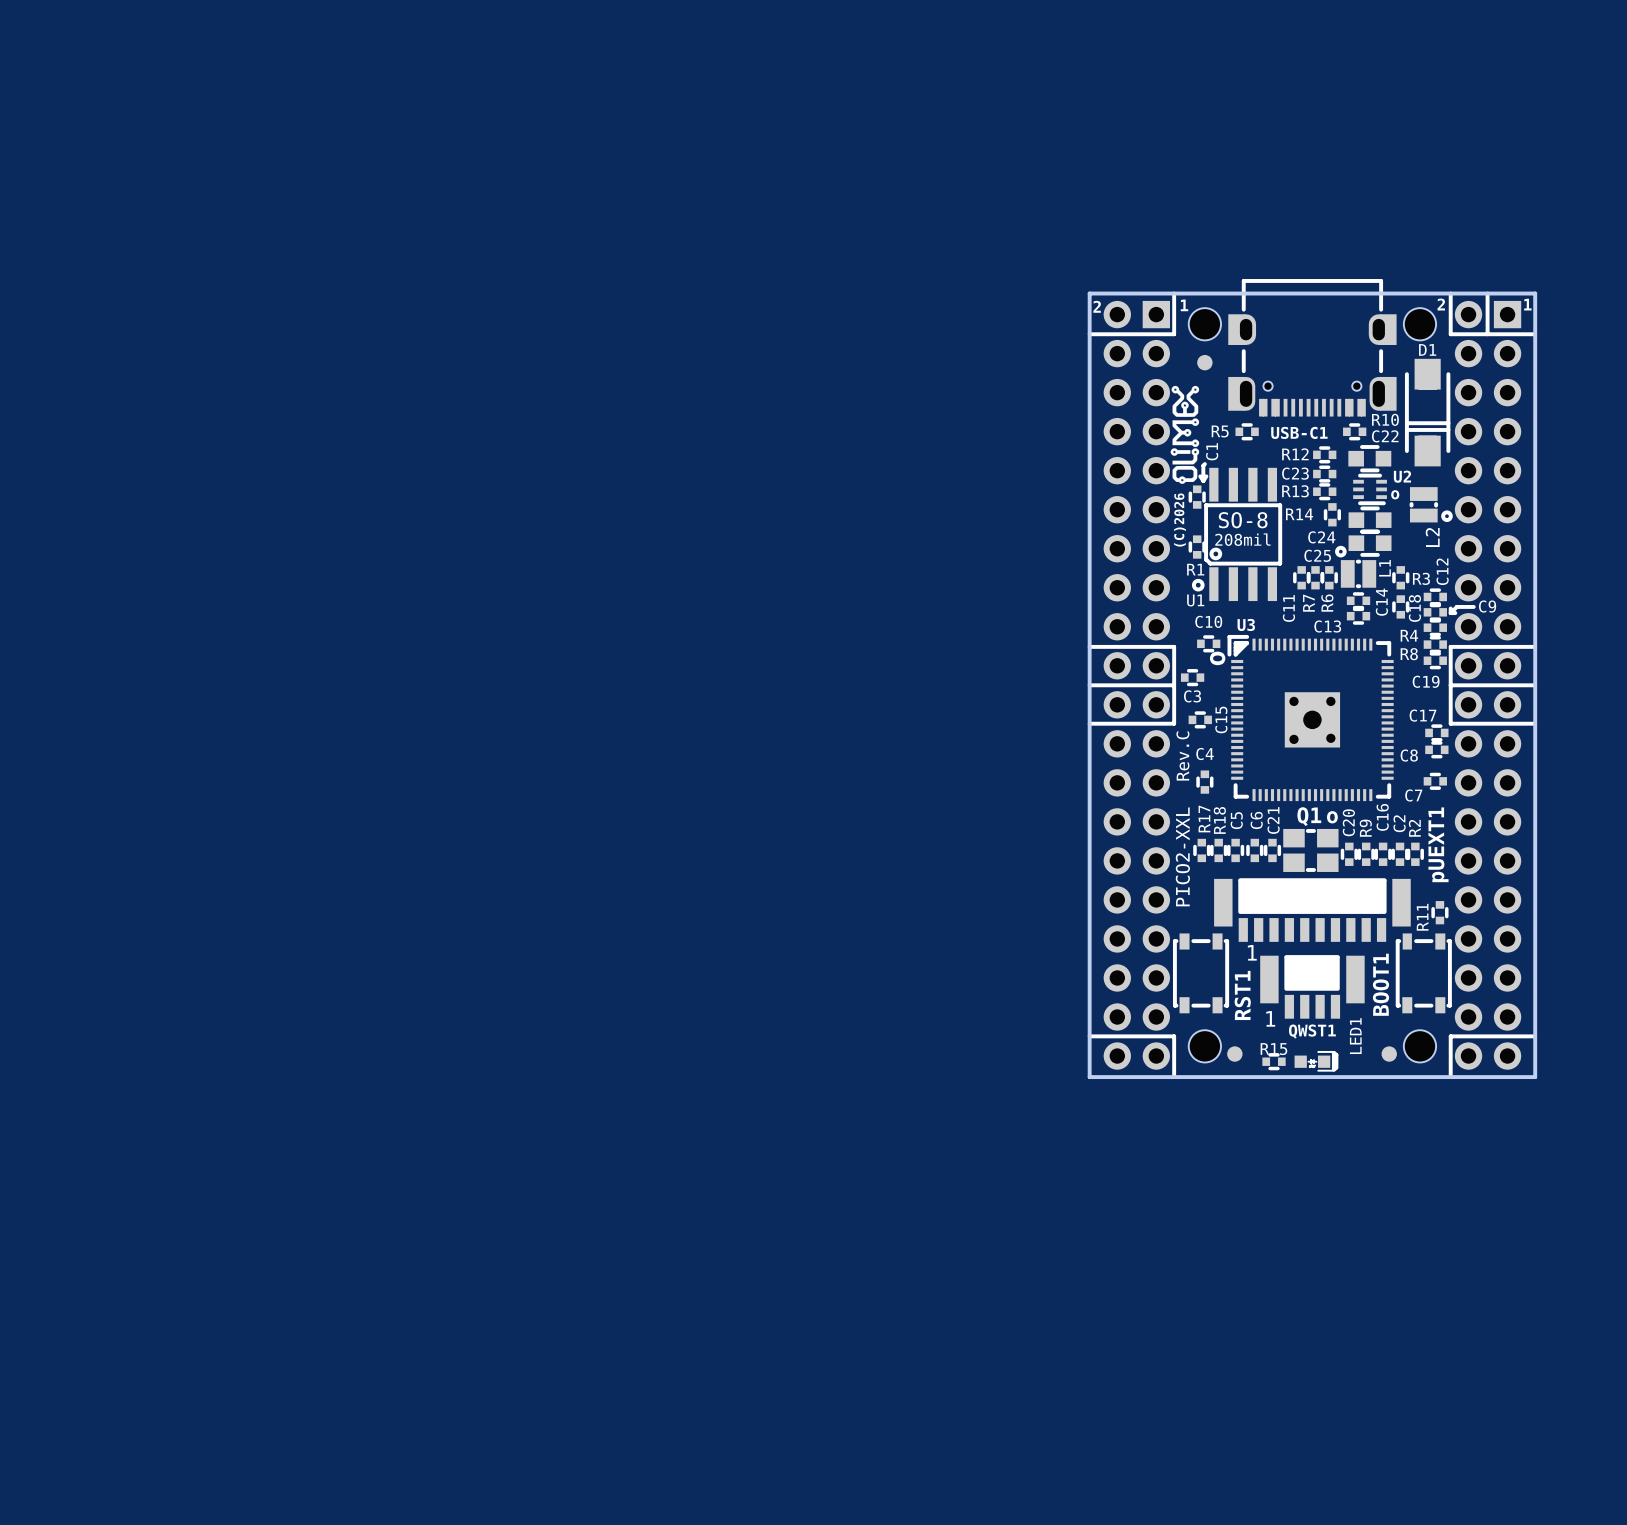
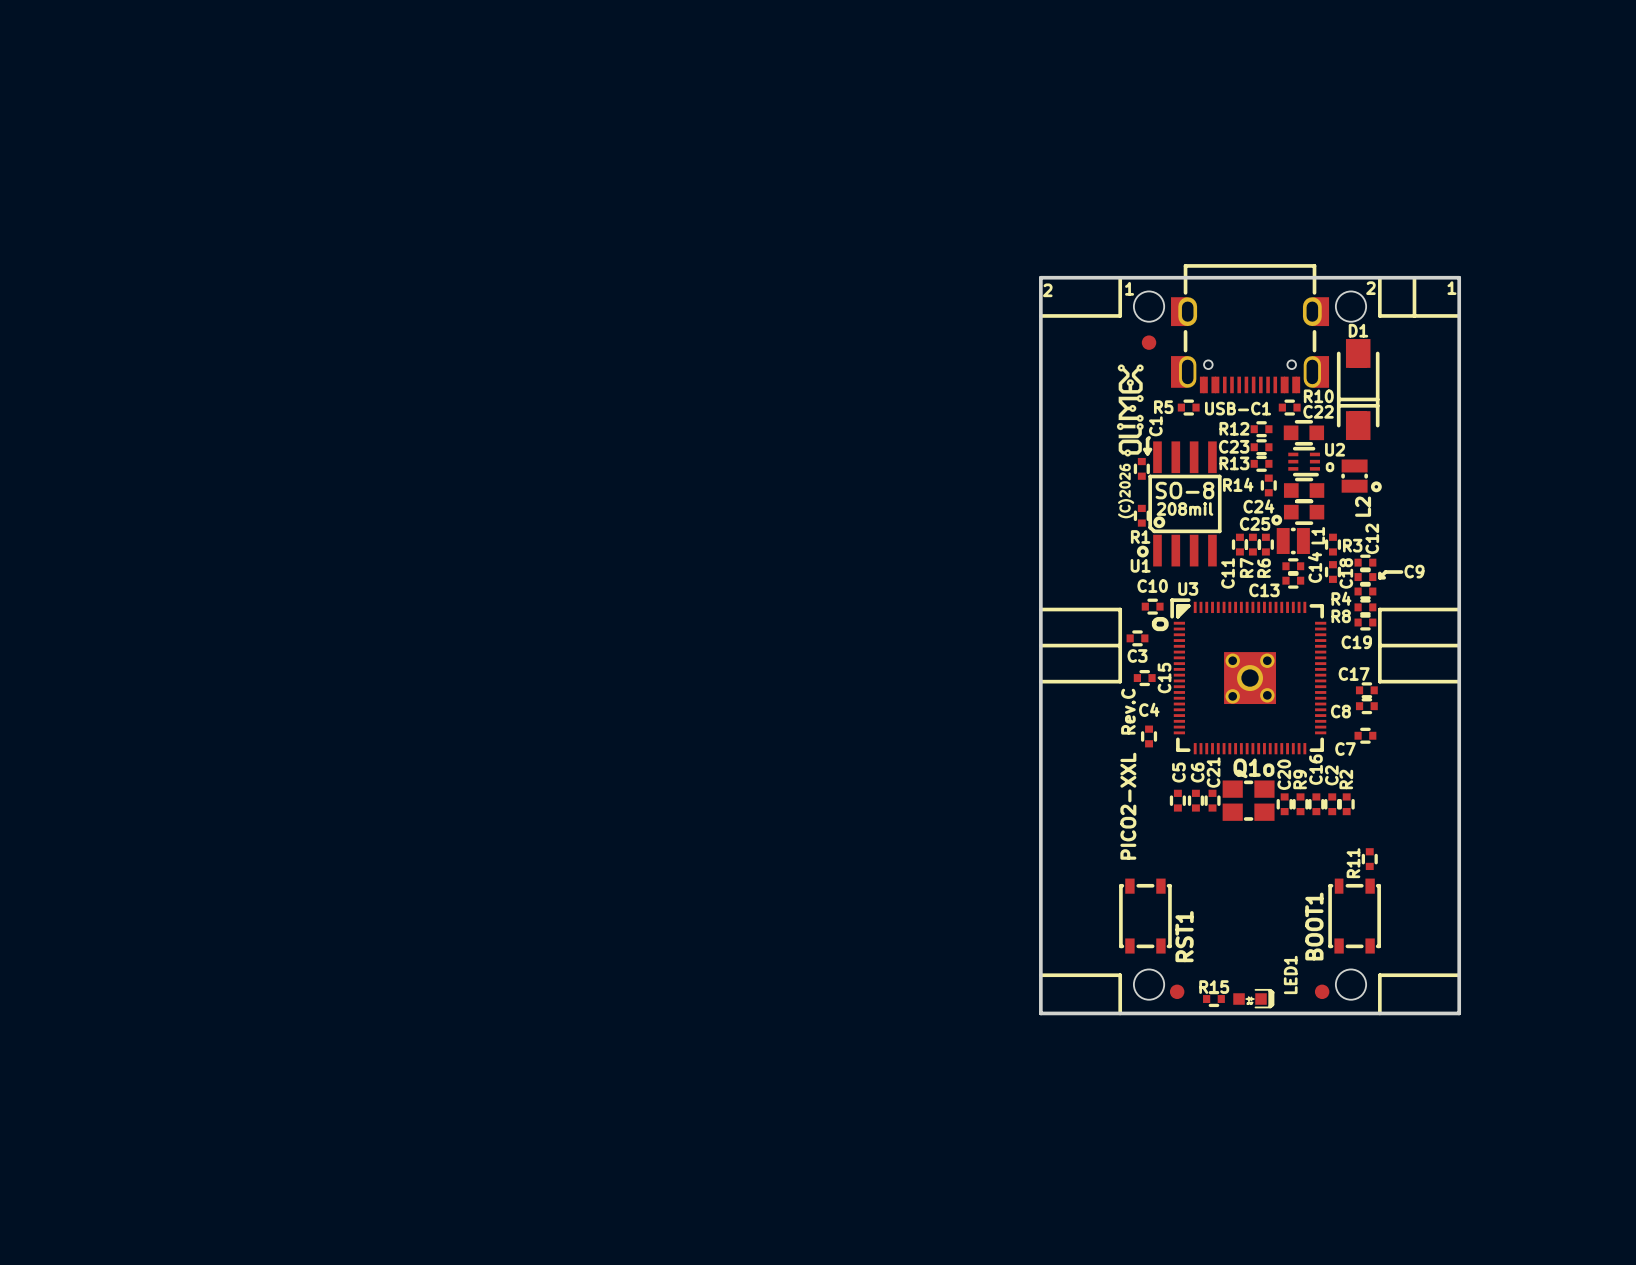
part: (1136, 685) -> none
part: (1488, 685) -> none
R17: (1201, 850) -> none
R18: (1218, 850) -> none
pUEXT1: (1312, 910) -> none
QWST1: (1312, 986) -> none

